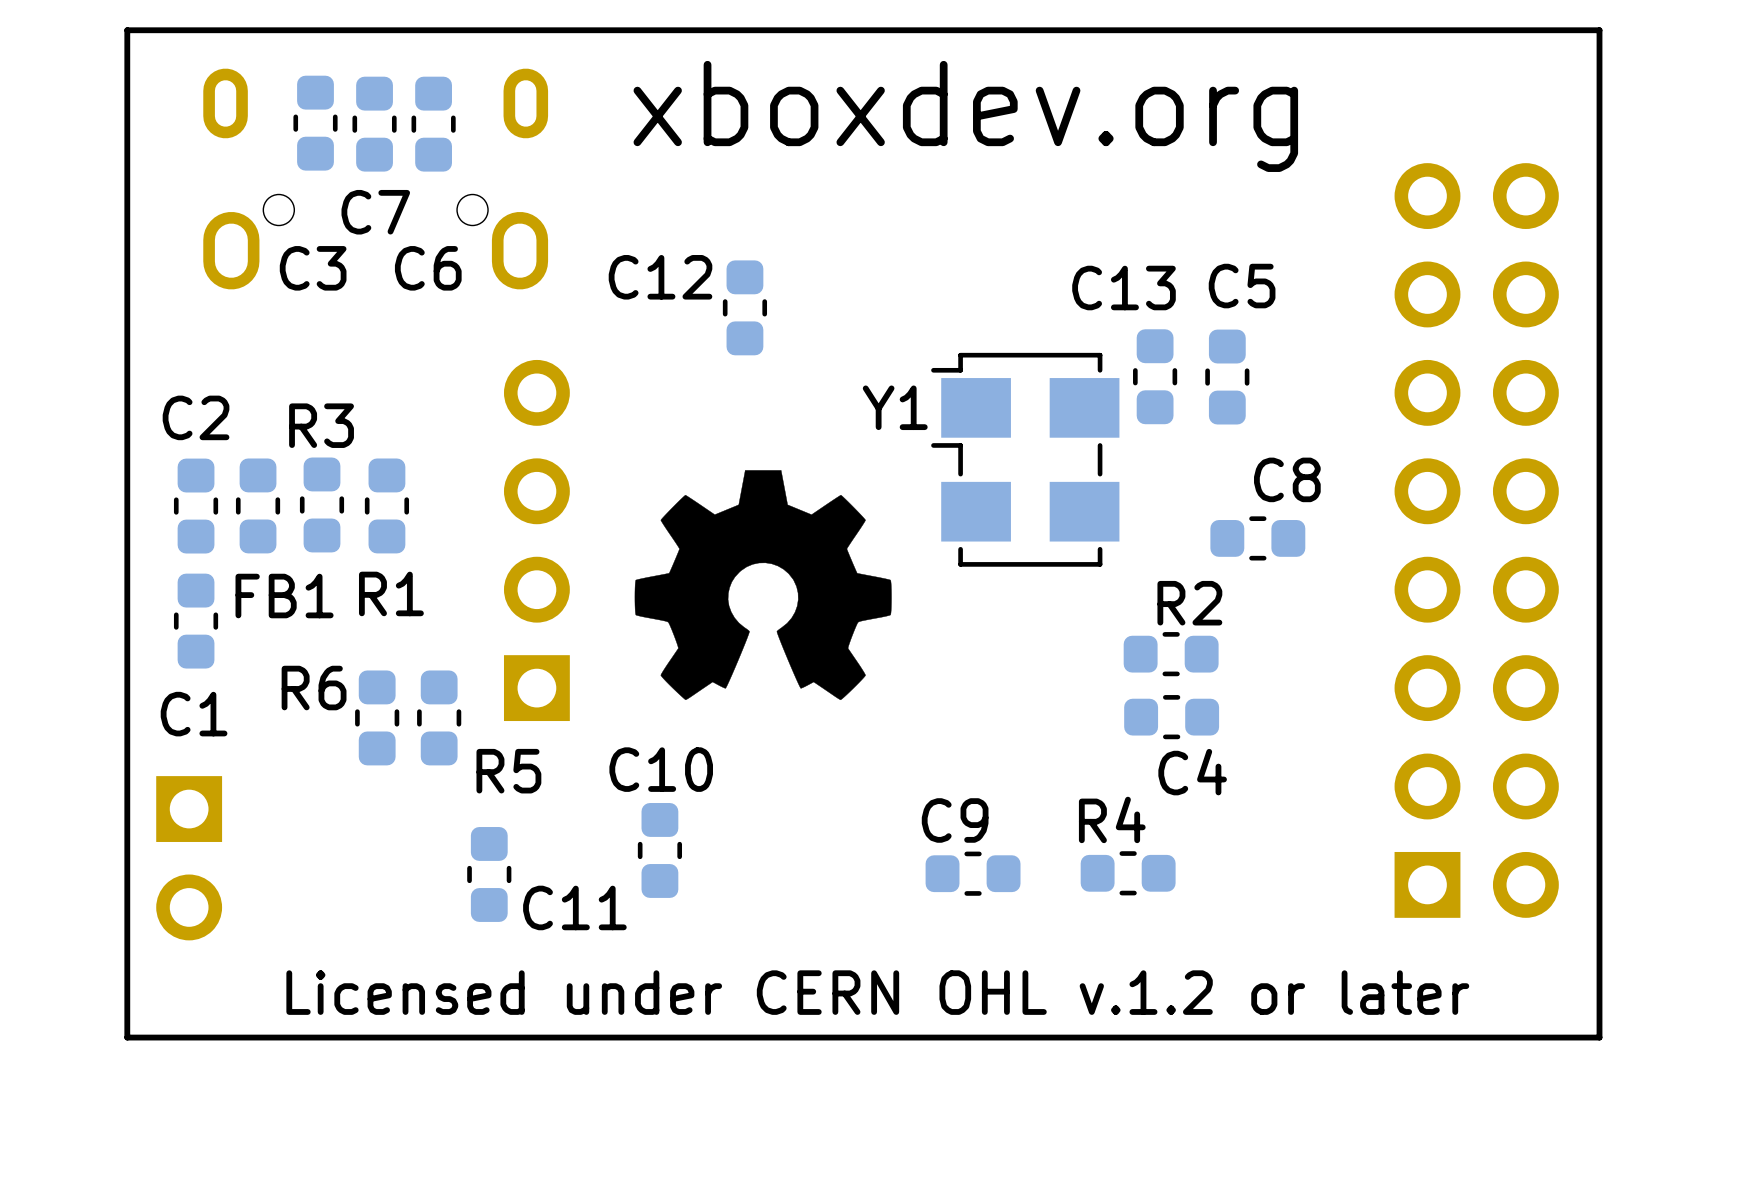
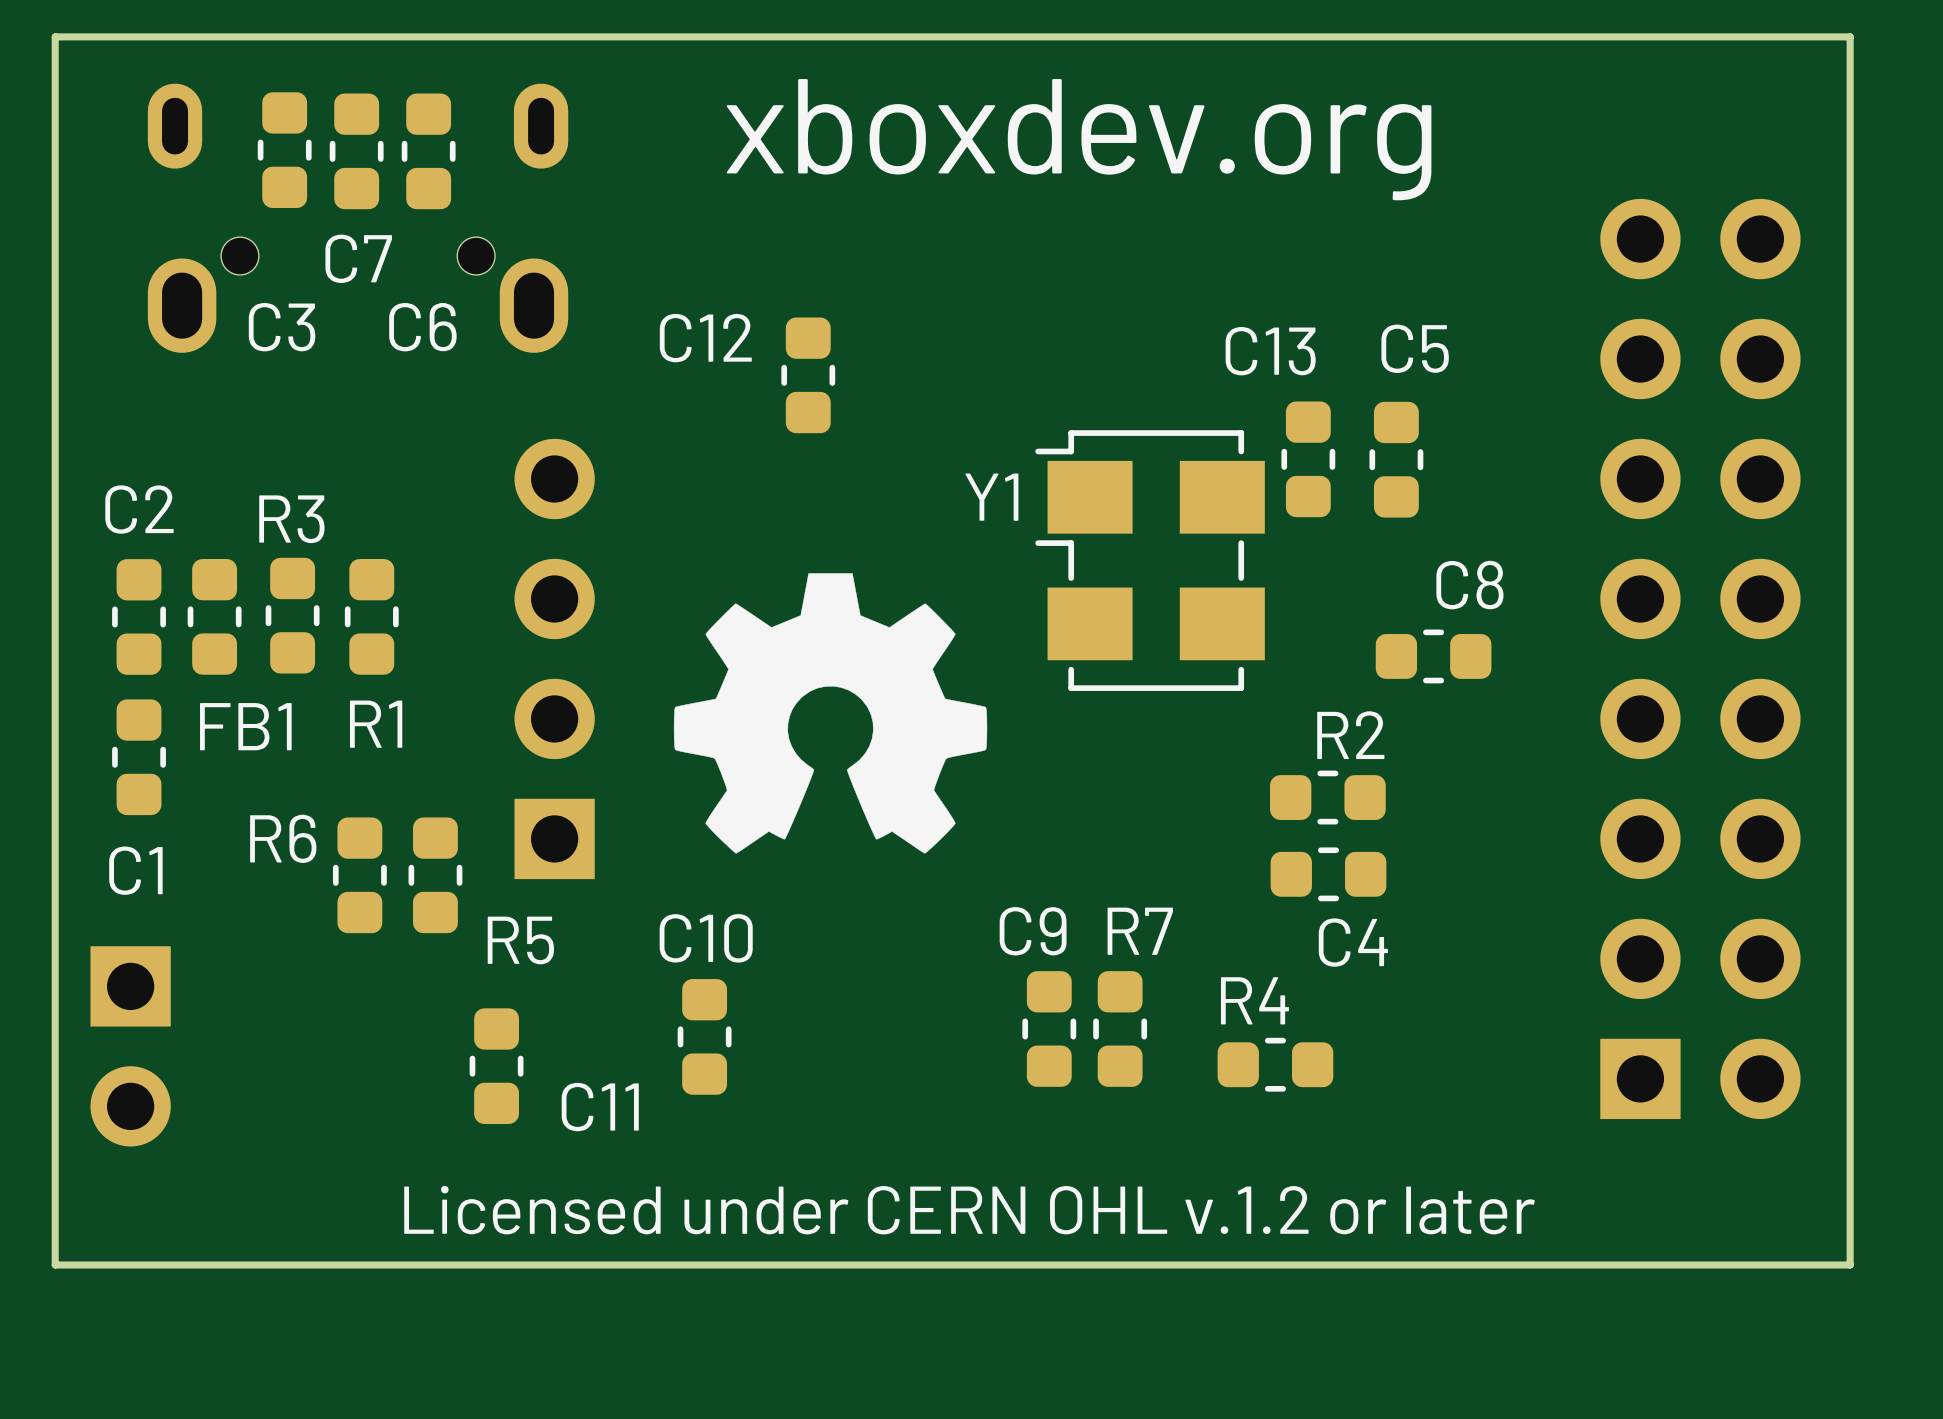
R7: none -> (1120, 1028)
C9 rotation: 0° (973, 873) -> 90° clockwise (1049, 1028)

